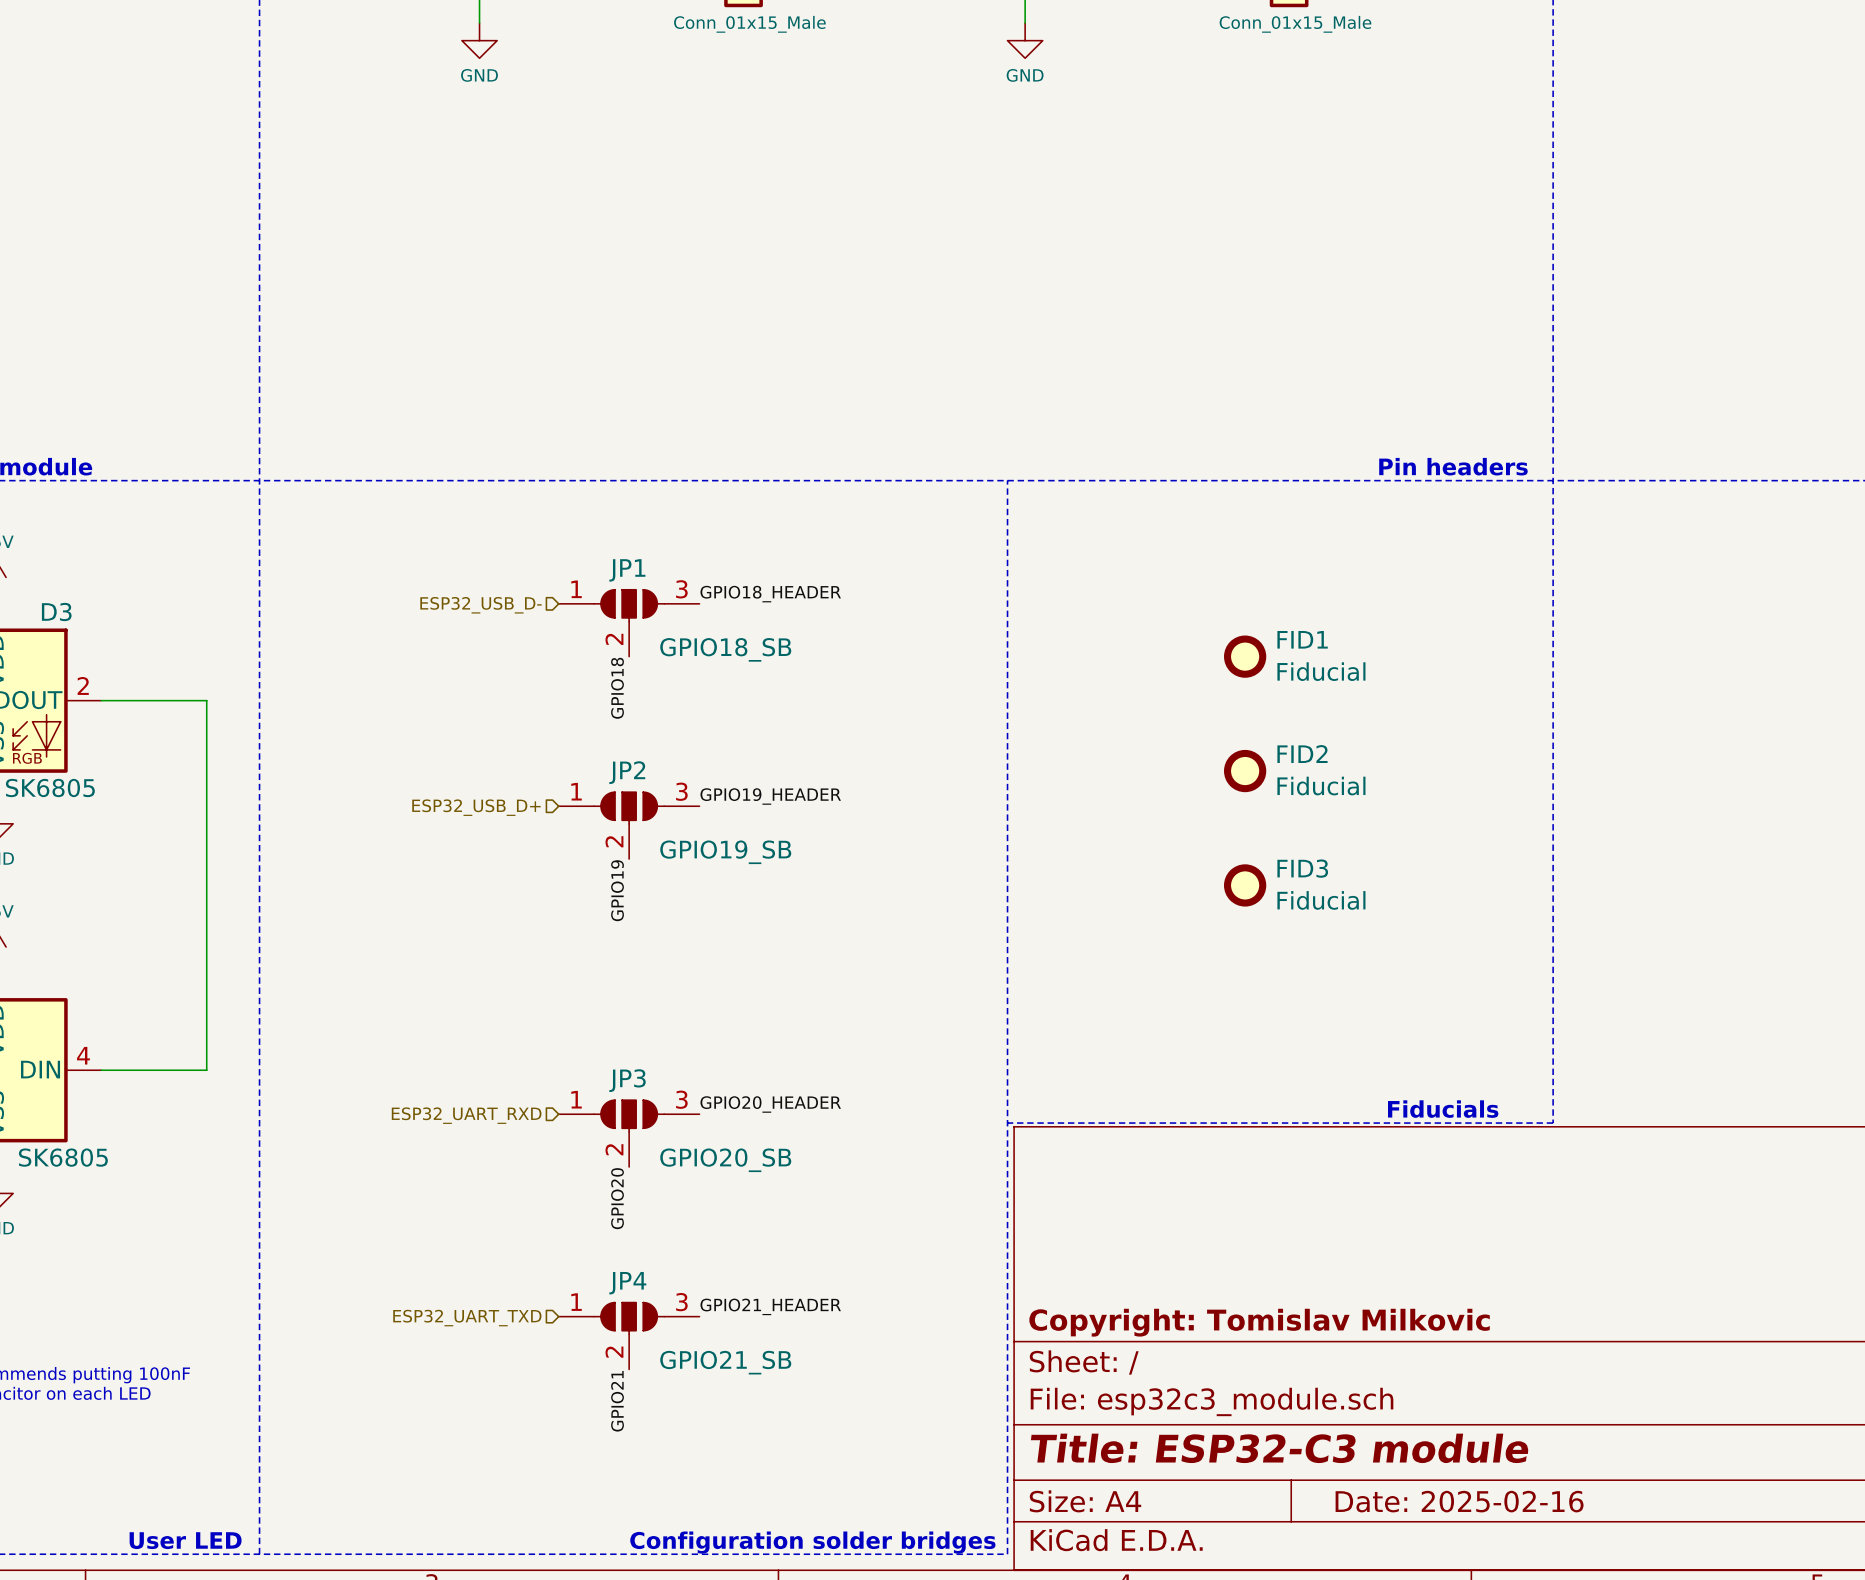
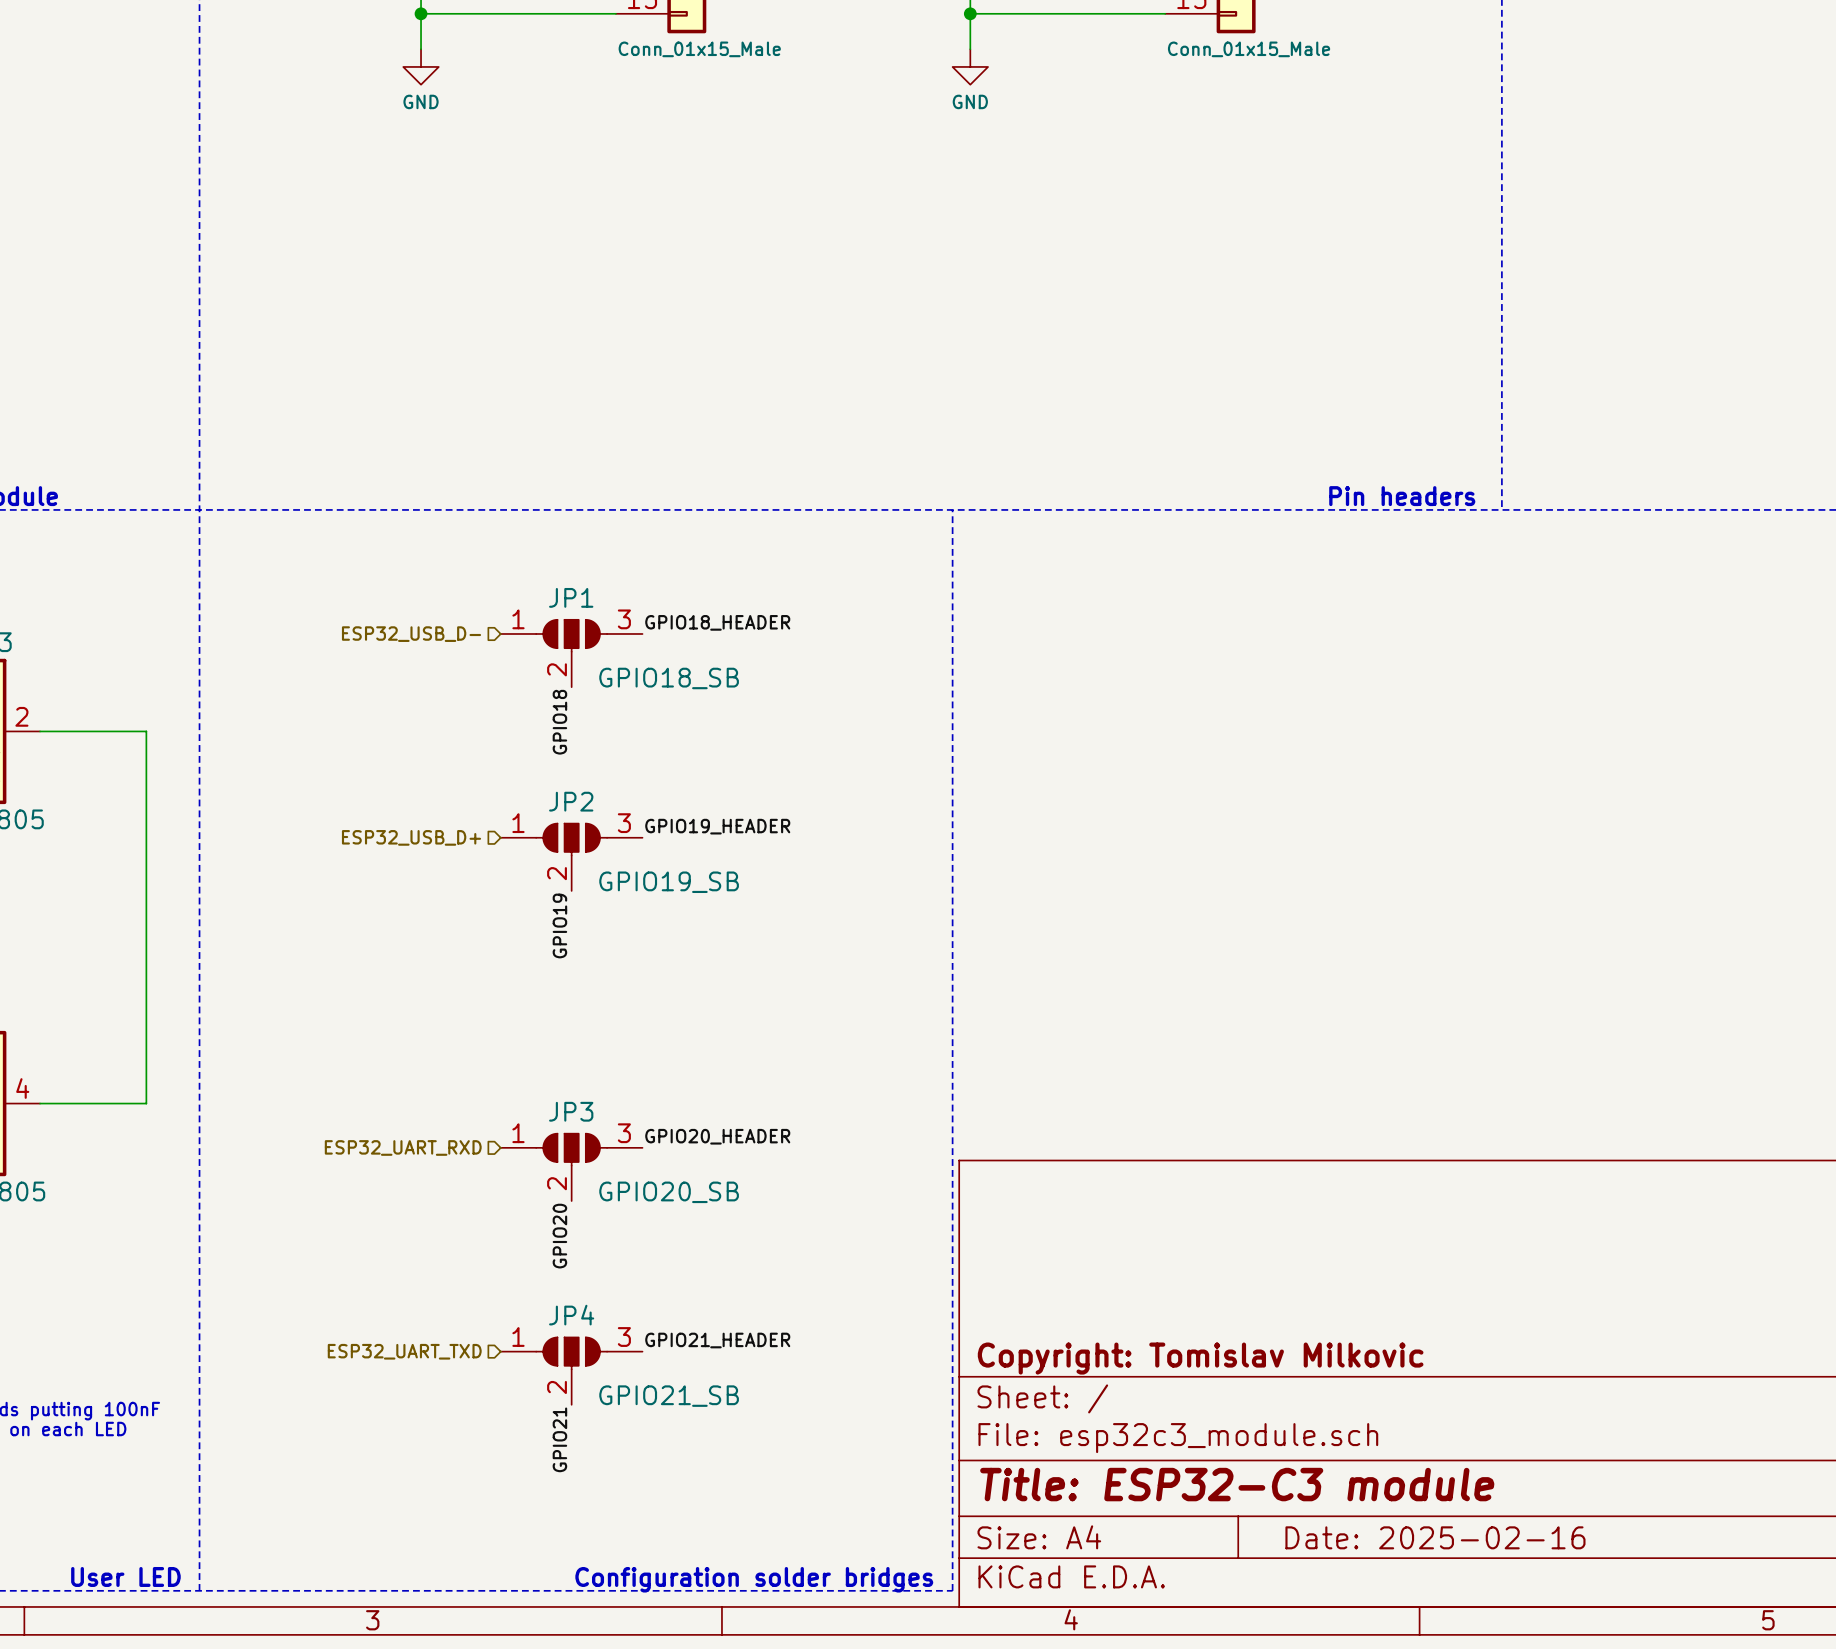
line: (1553, 480) (1553, 1123) (1007, 1123) -> none
FID1: Fiducial (1245, 656) -> none
FID2: Fiducial (1245, 771) -> none
FID3: Fiducial (1245, 885) -> none
text: Fiducials (1443, 1109) -> none

